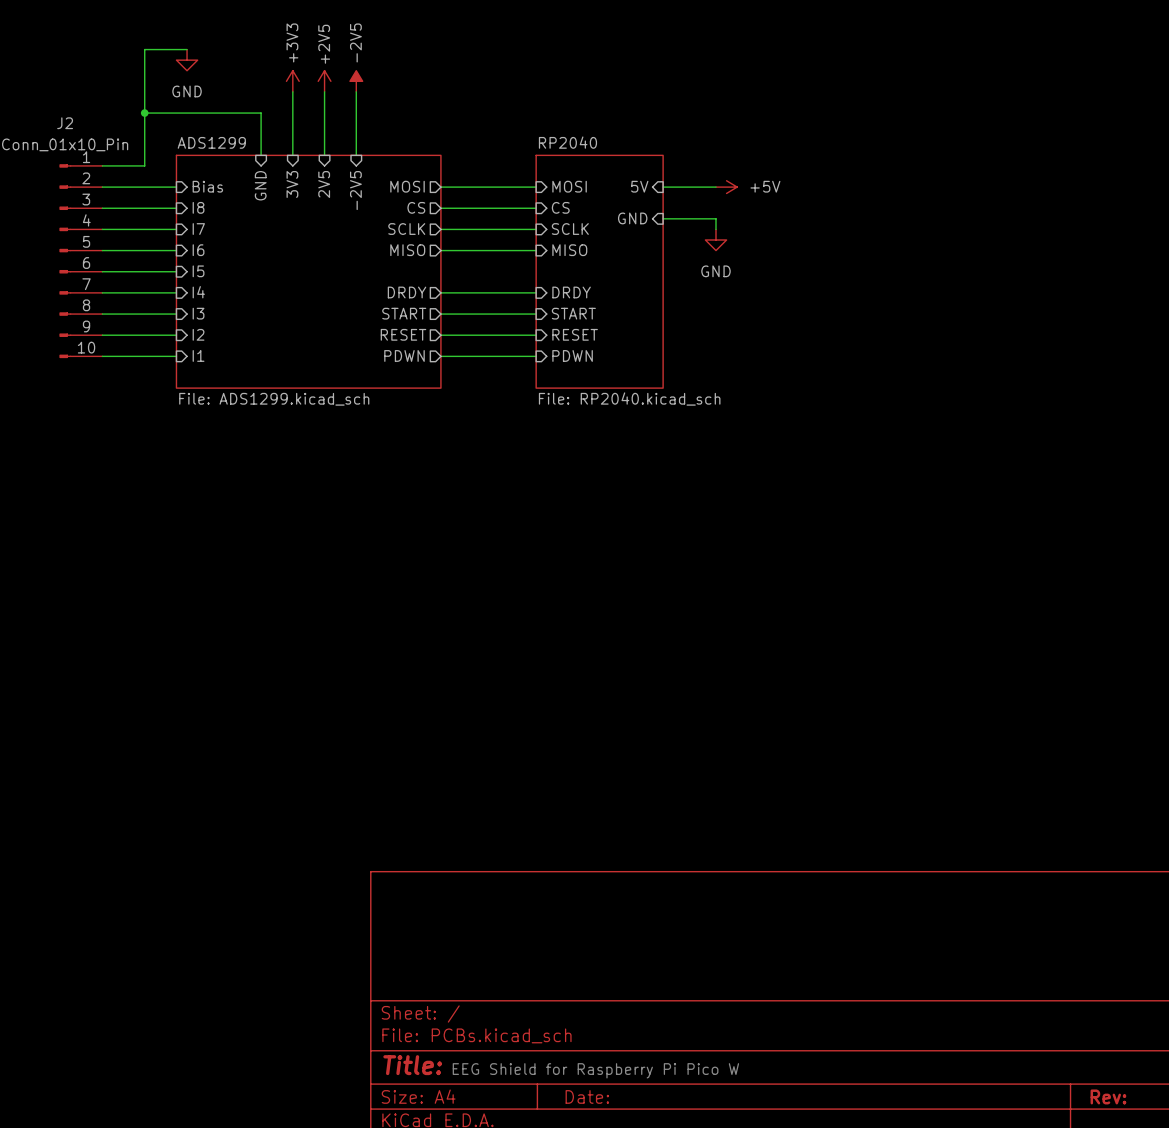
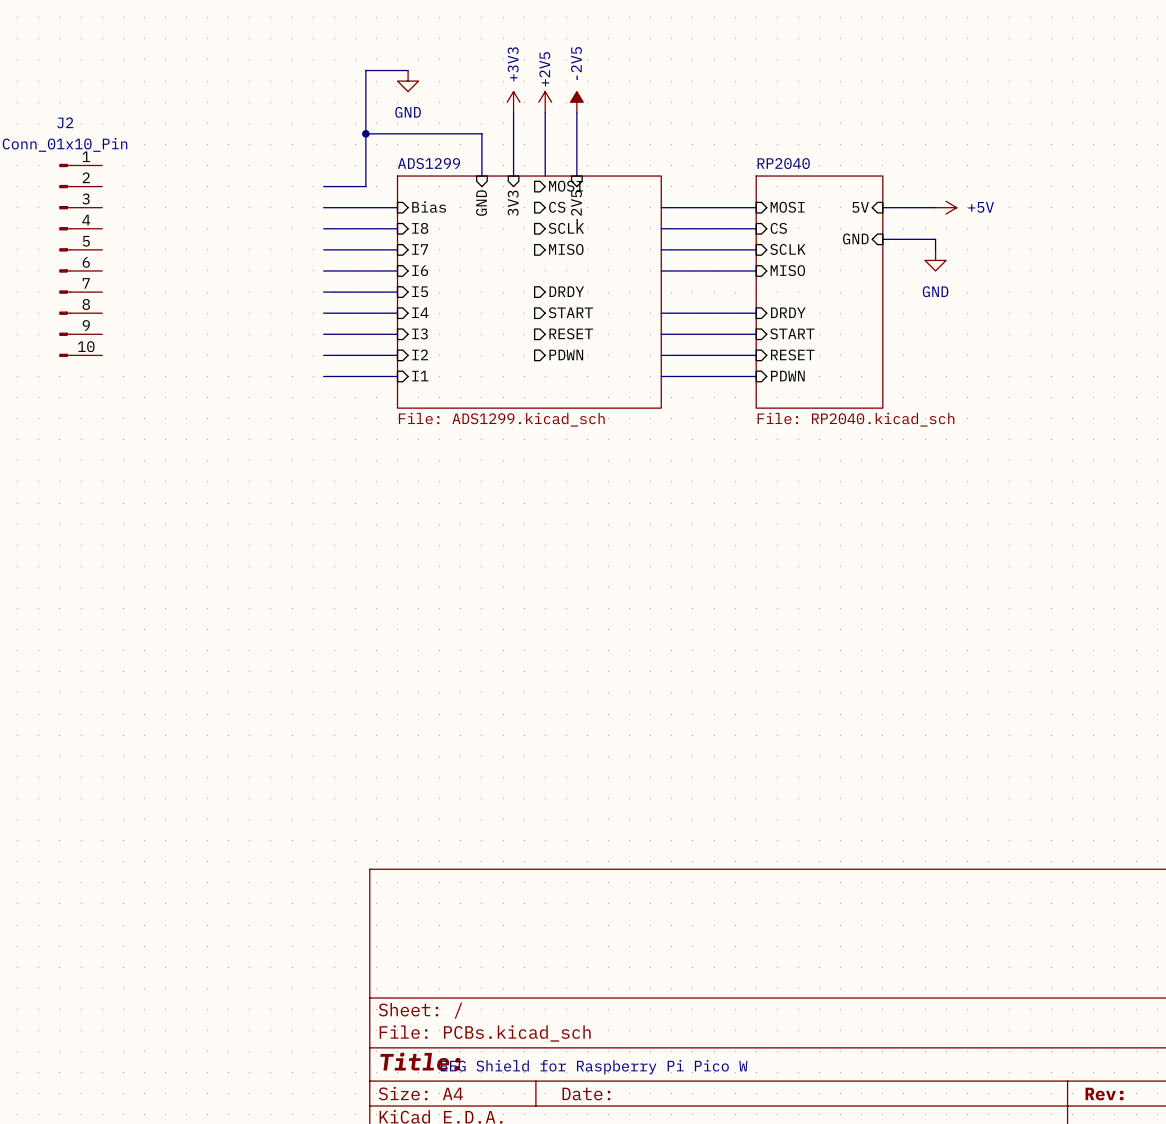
wire: (187, 49) (144, 49) (144, 165) (102, 165) -> none
power symbol: GND (187, 60) -> none
wire: none -> (408, 70) (365, 70) (365, 186) (323, 186)
power symbol: +3V3 (292, 81) -> none
power symbol: +2V5 (324, 81) -> none
power symbol: -2V5 (356, 81) -> none
power symbol: none -> GND (408, 81)
wire: (292, 91) (292, 155) -> none
wire: (324, 91) (324, 155) -> (513, 112) (513, 176)
wire: (356, 91) (356, 155) -> (545, 112) (545, 176)
power symbol: none -> +3V3 (513, 102)
power symbol: none -> +2V5 (545, 102)
power symbol: none -> -2V5 (576, 102)
wire: (144, 113) (261, 113) (261, 155) -> none
junction: (144, 113) -> none
wire: none -> (576, 112) (576, 176)
wire: none -> (365, 133) (481, 133) (481, 176)
junction: none -> (365, 133)
sheet pin: 3V3 (292, 184) -> none
sheet pin: 2V5 (324, 184) -> none
sheet pin: GND (260, 185) -> none
sheet pin: Bias (207, 186) -> none
sheet pin: MOSI (407, 186) -> none
sheet pin: 5V (639, 186) -> none
wire: (102, 187) (176, 187) -> none
wire: (440, 187) (536, 187) -> none
wire: (663, 187) (716, 187) -> none
power symbol: +5V (726, 187) -> none
sheet pin: -2V5 (355, 190) -> none
sheet pin: none -> 3V3 (513, 203)
sheet pin: none -> GND (481, 203)
sheet pin: I8 (198, 207) -> none
sheet pin: CS (416, 207) -> none
sheet pin: none -> Bias (429, 207)
sheet pin: none -> MOSI (787, 207)
sheet pin: none -> 5V (860, 207)
wire: (102, 208) (176, 208) -> none
wire: none -> (323, 207) (397, 207)
wire: (440, 208) (536, 208) -> none
wire: none -> (661, 207) (756, 207)
wire: none -> (882, 207) (935, 207)
power symbol: none -> +5V (946, 207)
sheet pin: none -> -2V5 (576, 206)
sheet pin: GND (632, 218) -> none
wire: (663, 218) (716, 218) (716, 229) -> none
wire: (102, 229) (176, 229) -> none
sheet pin: I7 (198, 229) -> none
wire: none -> (323, 228) (397, 228)
sheet pin: SCLK (406, 229) -> none
sheet pin: none -> I8 (420, 228)
wire: (440, 229) (536, 229) -> none
wire: none -> (661, 228) (756, 228)
sheet pin: none -> CS (778, 228)
power symbol: GND (716, 239) -> none
sheet pin: none -> GND (855, 238)
wire: none -> (882, 239) (935, 239) (935, 249)
wire: (102, 250) (176, 250) -> none
sheet pin: I6 (198, 250) -> none
wire: none -> (323, 249) (397, 249)
sheet pin: MISO (407, 250) -> none
sheet pin: none -> I7 (420, 249)
wire: (440, 250) (536, 250) -> none
wire: none -> (661, 249) (756, 249)
sheet pin: none -> SCLK (787, 249)
power symbol: none -> GND (935, 260)
wire: (102, 271) (176, 271) -> none
sheet pin: I5 (198, 271) -> none
sheet ADS1299 position: (308, 271) -> (529, 292)
wire: none -> (323, 270) (397, 270)
sheet pin: none -> I6 (420, 270)
sheet RP2040 position: (599, 271) -> (819, 292)
wire: none -> (661, 270) (756, 270)
sheet pin: none -> MISO (787, 270)
wire: (102, 292) (176, 292) -> none
sheet pin: I4 (198, 292) -> none
wire: none -> (323, 292) (397, 292)
sheet pin: DRDY (407, 292) -> none
sheet pin: none -> I5 (420, 291)
wire: (440, 292) (536, 292) -> none
sheet pin: I3 (198, 313) -> none
sheet pin: START (404, 313) -> none
sheet pin: none -> I4 (420, 312)
sheet pin: none -> DRDY (788, 312)
wire: (102, 314) (176, 314) -> none
wire: none -> (323, 313) (397, 313)
wire: (440, 314) (536, 314) -> none
wire: none -> (661, 313) (756, 313)
sheet pin: I2 (198, 334) -> none
sheet pin: RESET (403, 334) -> none
sheet pin: none -> I3 (420, 333)
sheet pin: none -> START (792, 333)
wire: (102, 335) (176, 335) -> none
wire: none -> (323, 334) (397, 334)
wire: (440, 335) (536, 335) -> none
wire: none -> (661, 334) (756, 334)
sheet pin: I1 (198, 355) -> none
sheet pin: PDWN (404, 355) -> none
sheet pin: none -> I2 (420, 354)
sheet pin: none -> RESET (792, 354)
wire: (102, 356) (176, 356) -> none
wire: none -> (323, 355) (397, 355)
wire: (440, 356) (536, 356) -> none
wire: none -> (661, 355) (756, 355)
wire: none -> (323, 376) (397, 376)
sheet pin: none -> I1 (420, 376)
wire: none -> (661, 376) (756, 376)
sheet pin: none -> PDWN (787, 376)

